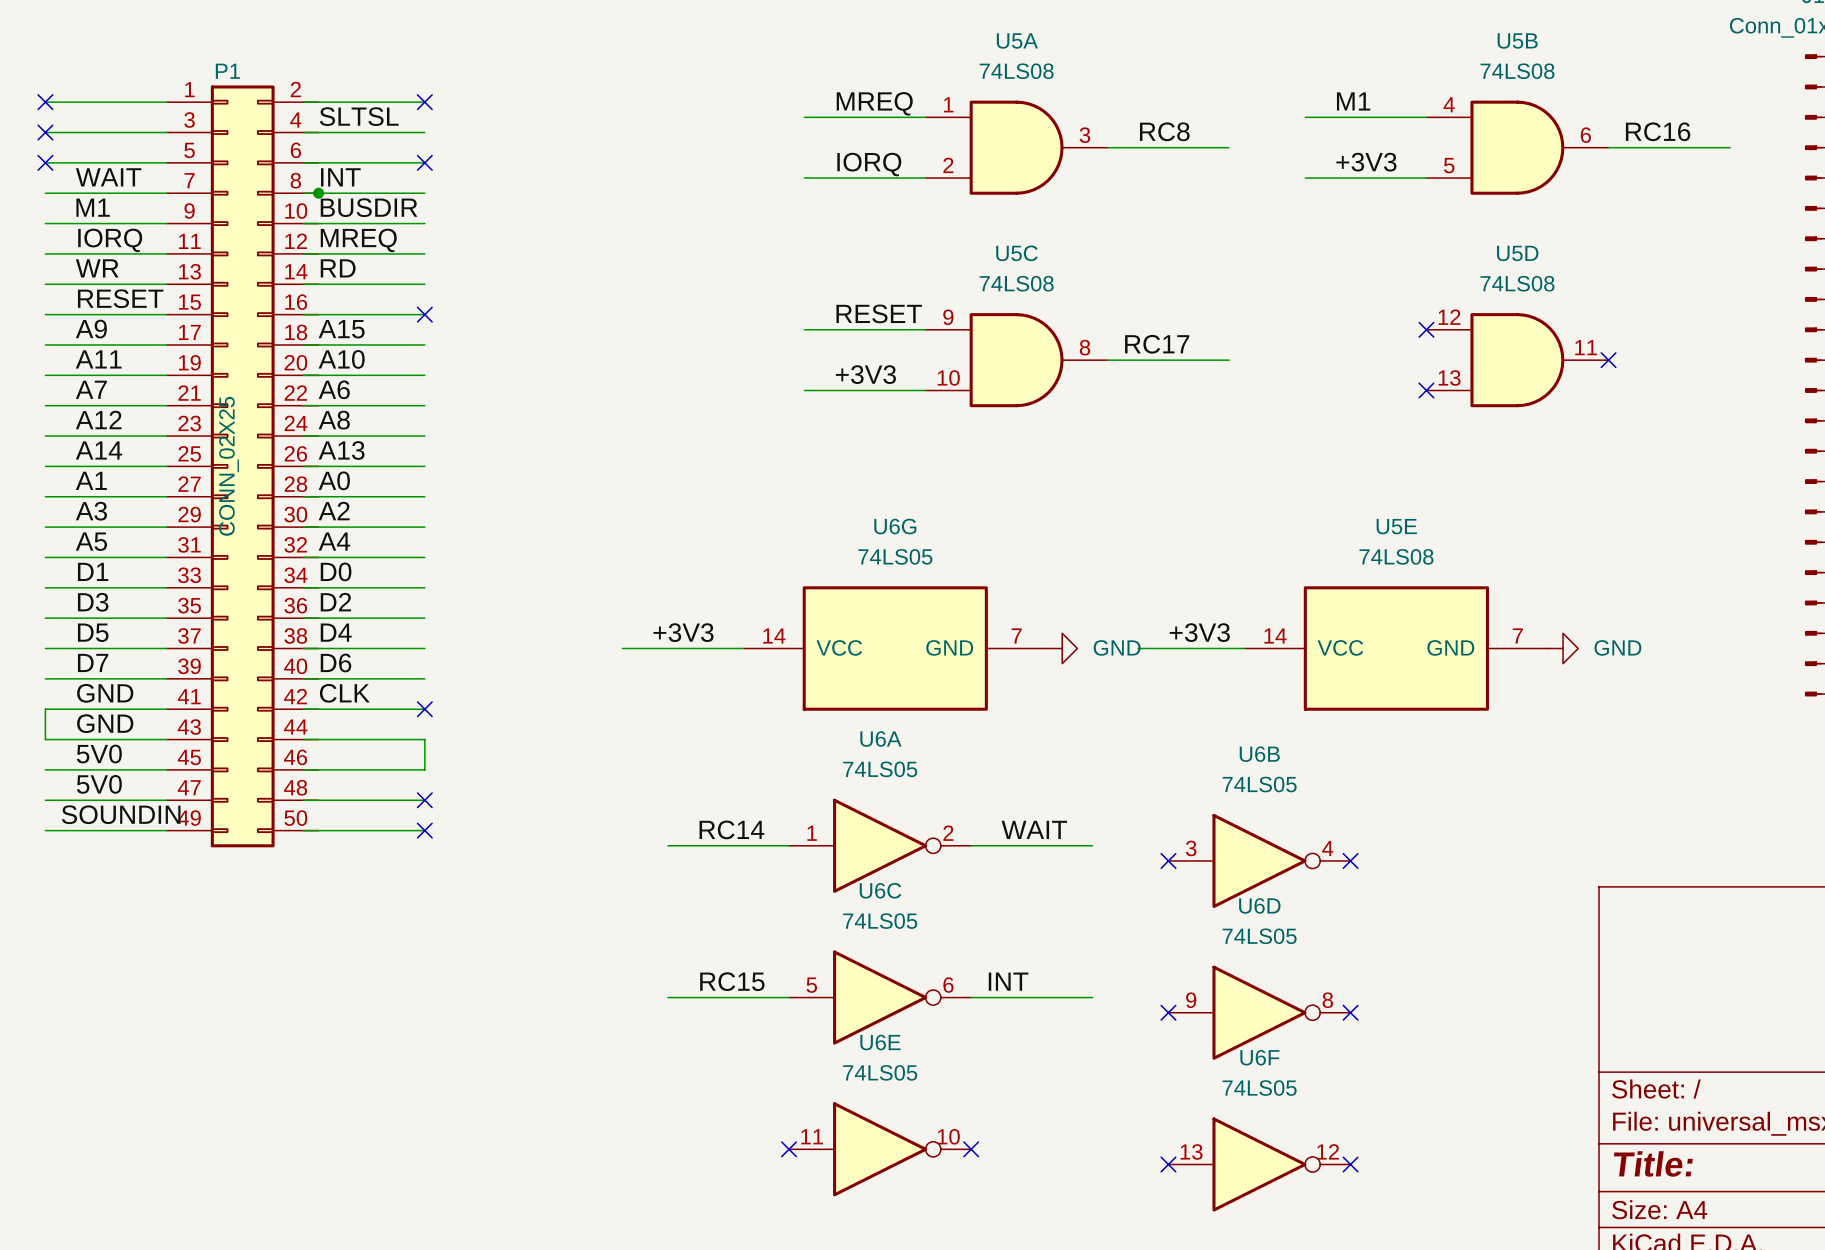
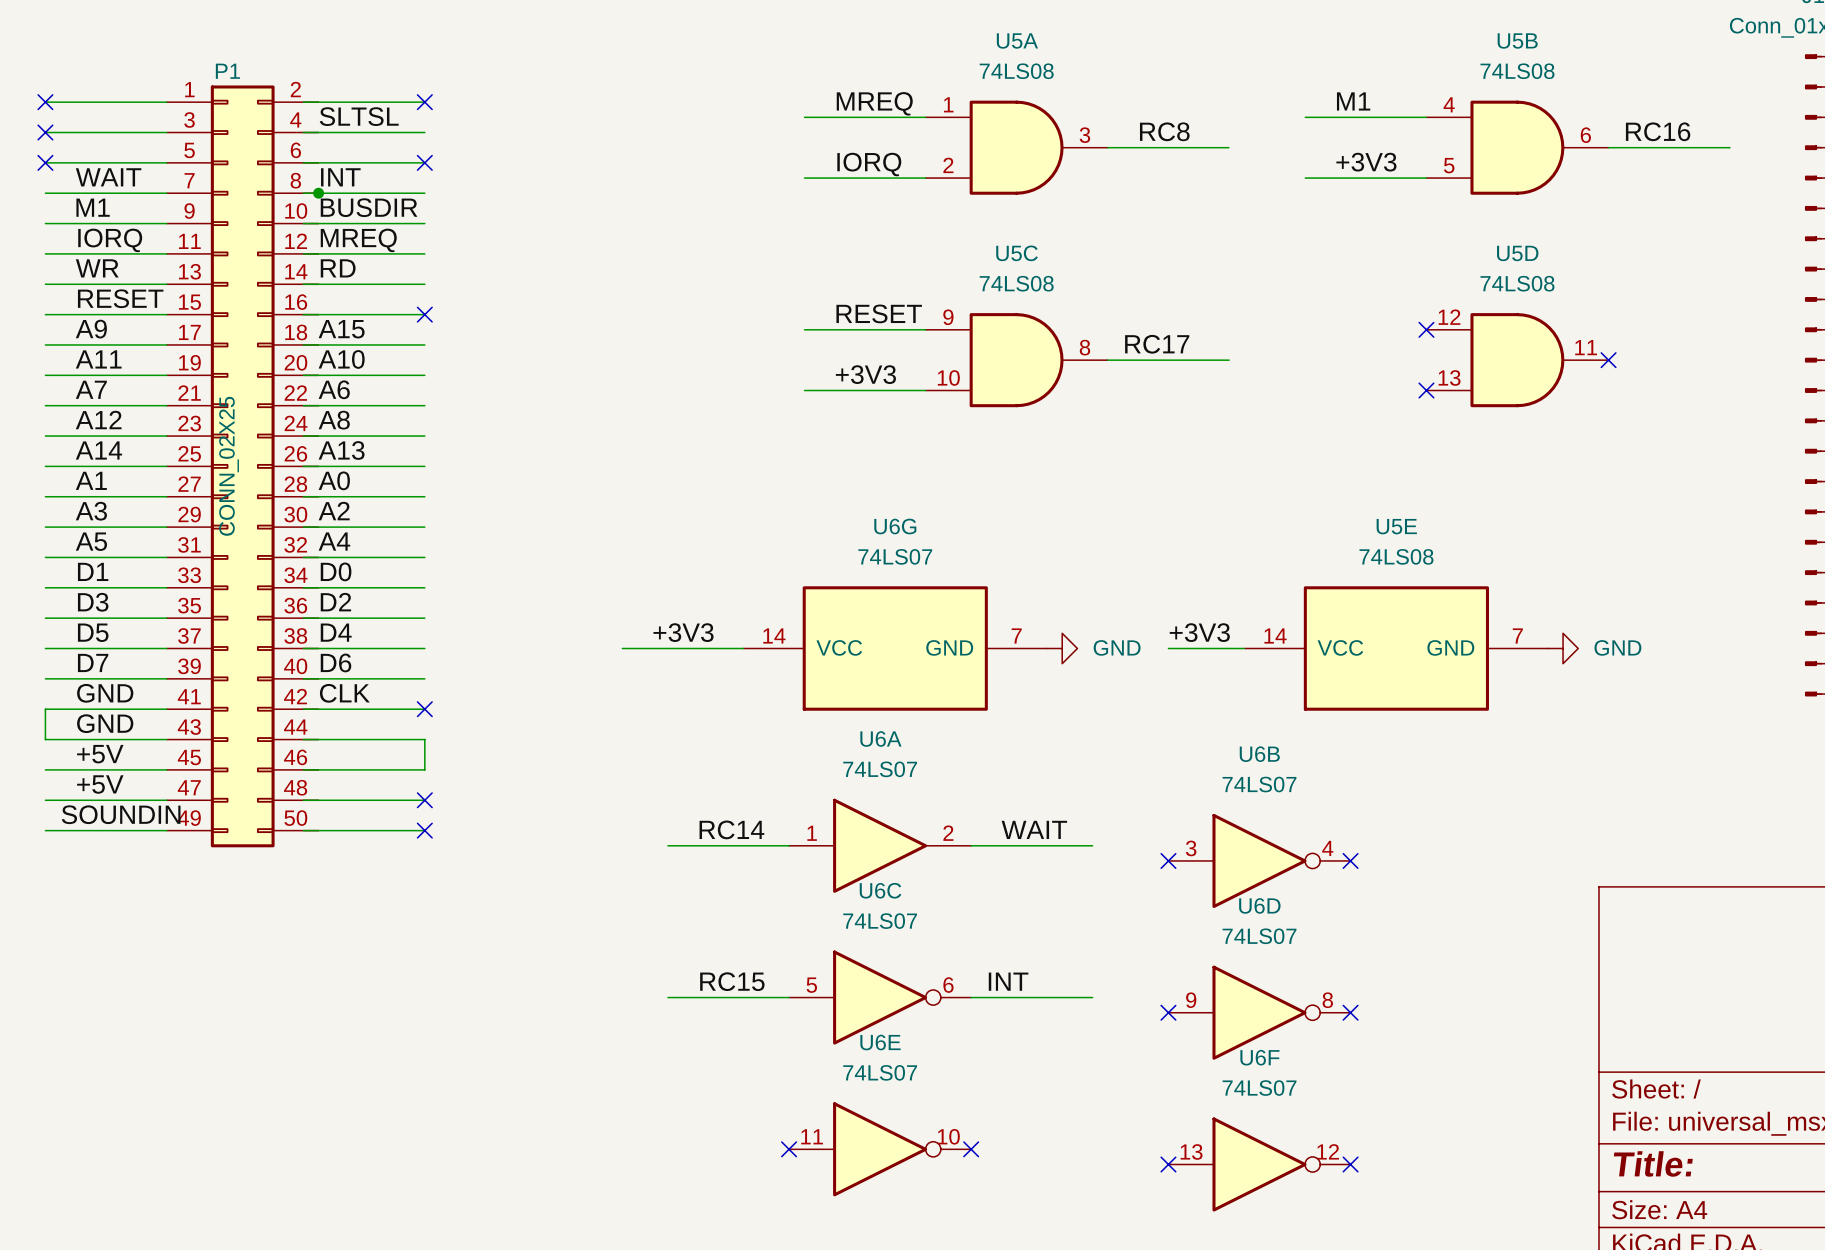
U6G value: 74LS05 (895, 556) -> 74LS07 (895, 556)
wire: (1138, 648) (1168, 648) -> none
label: 5V0 (99, 754) -> +5V (100, 754)
U6A value: 74LS05 (880, 769) -> 74LS07 (880, 769)
label: 5V0 (99, 784) -> +5V (100, 784)
U6B value: 74LS05 (1259, 784) -> 74LS07 (1259, 784)
U6A symbol: [789, 798, 972, 893] -> [789, 798, 972, 893]
U6C value: 74LS05 (880, 921) -> 74LS07 (880, 921)
U6D value: 74LS05 (1259, 936) -> 74LS07 (1259, 936)
U6E value: 74LS05 (880, 1072) -> 74LS07 (880, 1072)
U6F value: 74LS05 (1259, 1088) -> 74LS07 (1259, 1088)

